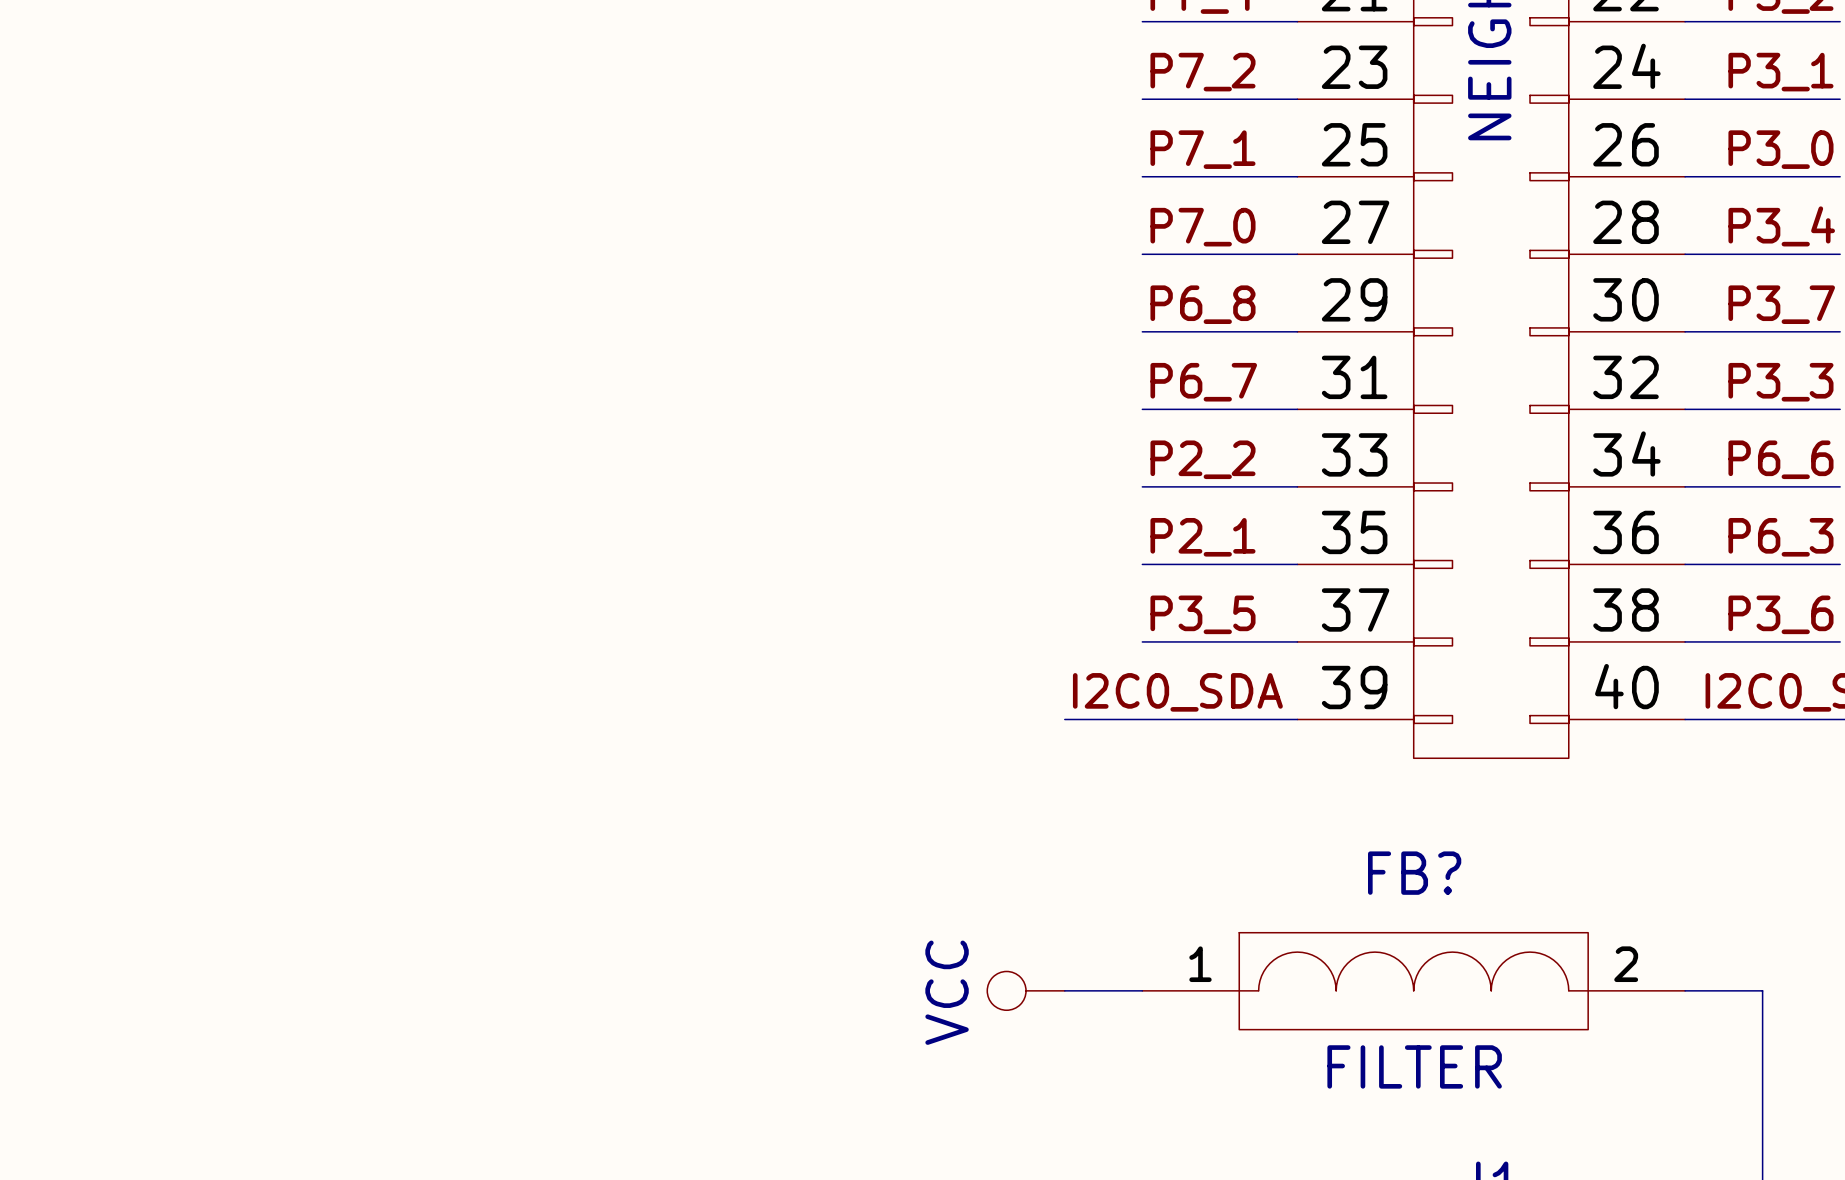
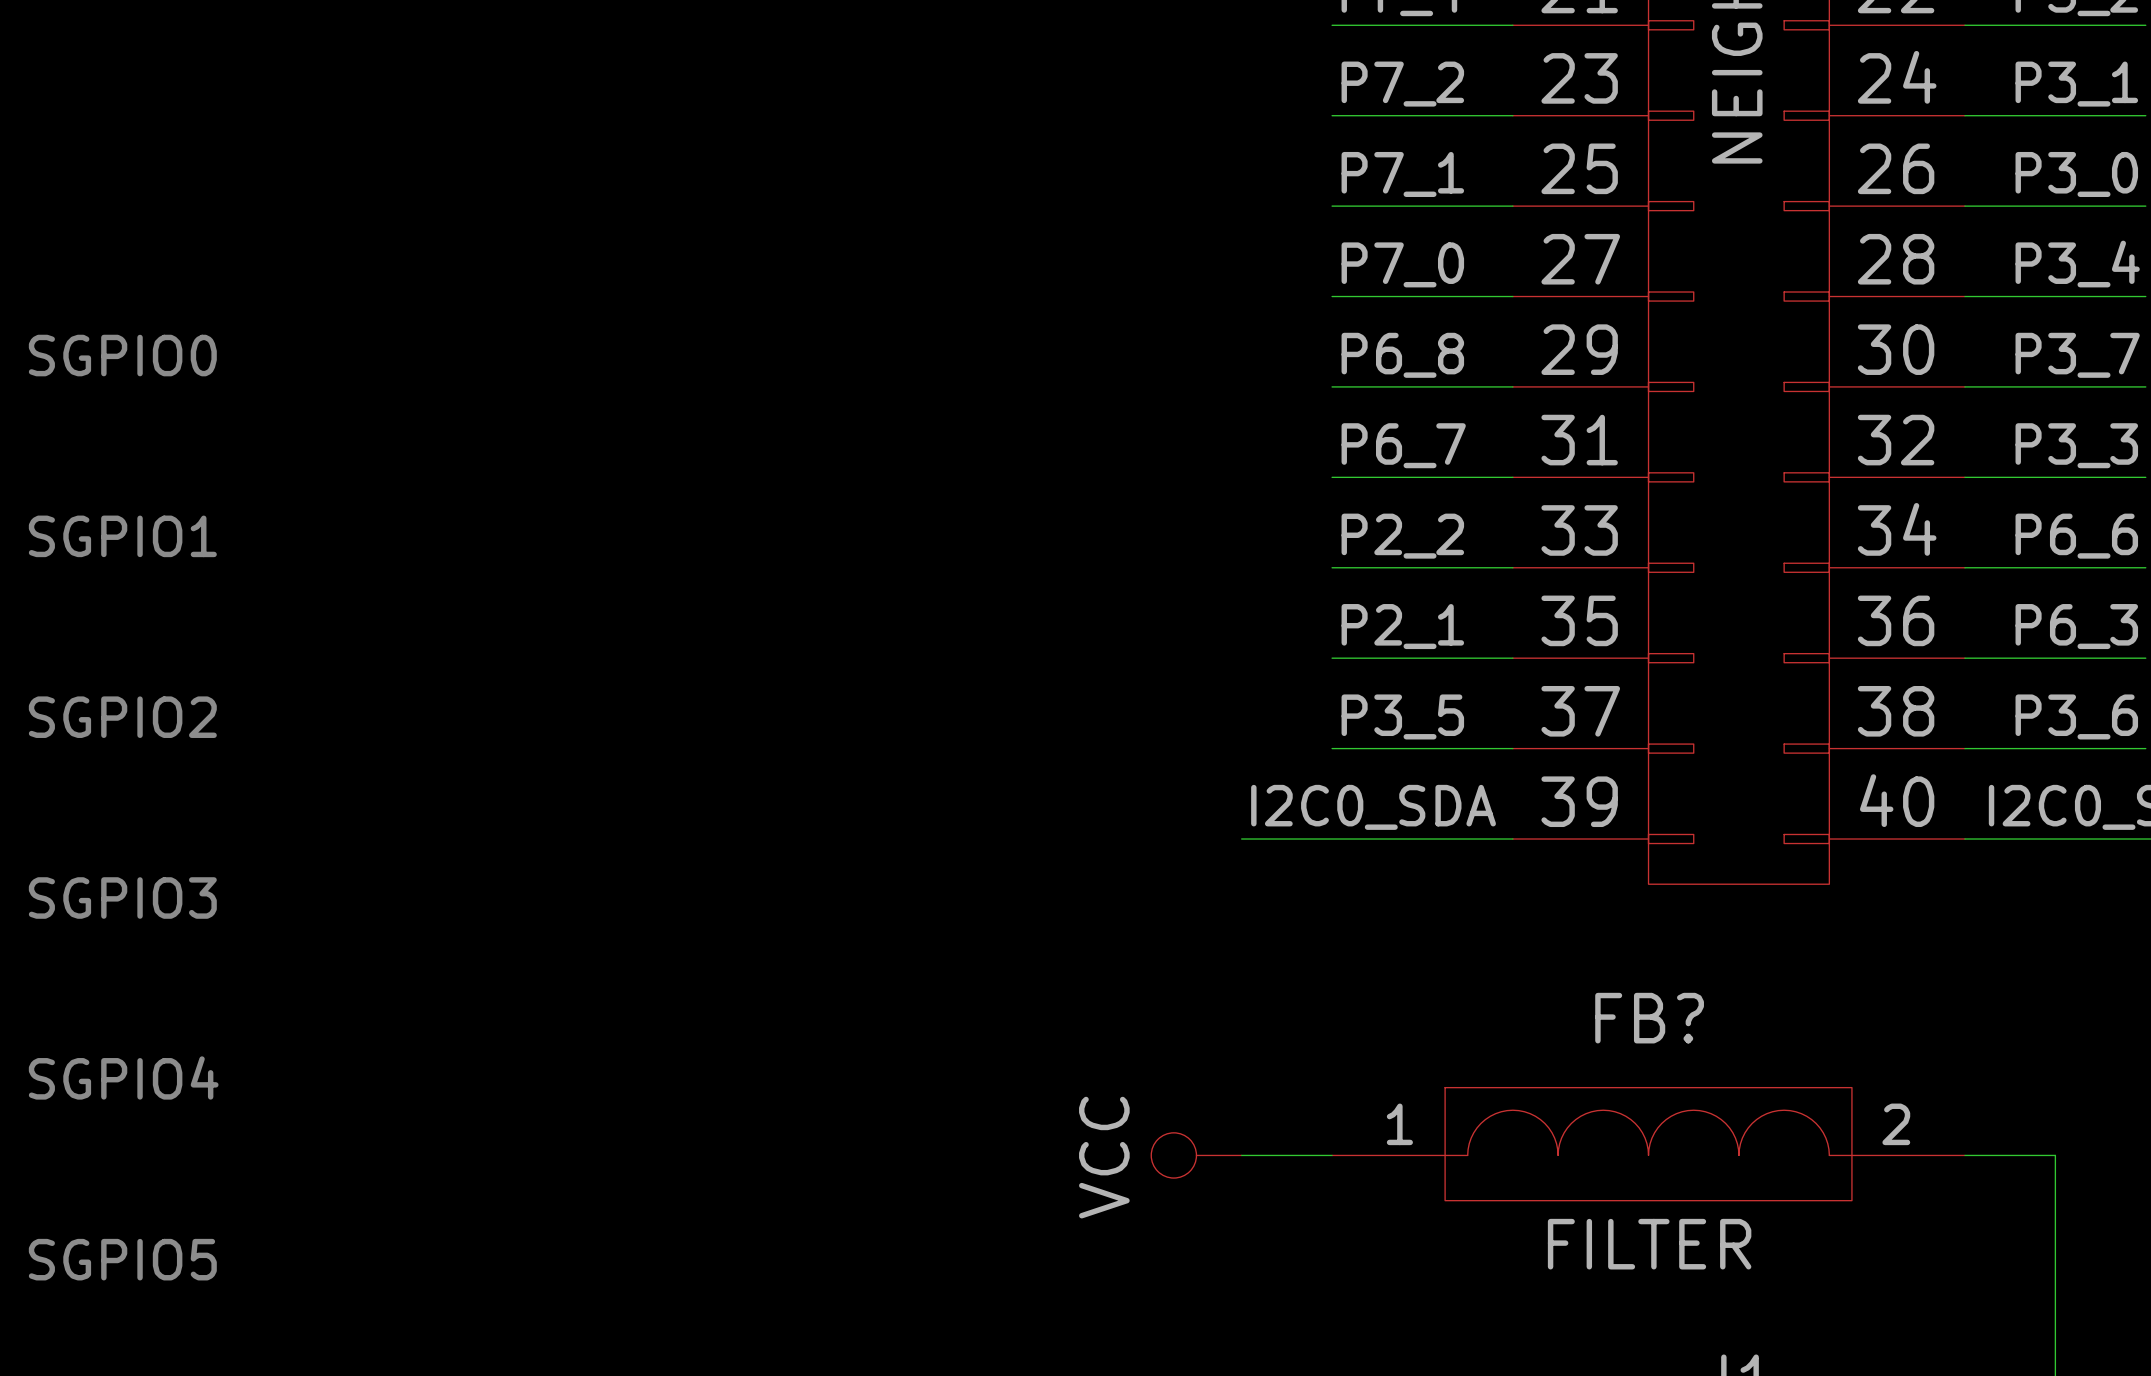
text: none -> SGPIO0 (122, 355)
text: none -> SGPIO1 (122, 536)
text: none -> SGPIO2 (122, 717)
text: none -> SGPIO3 (122, 898)
text: none -> SGPIO4 (123, 1077)
text: none -> SGPIO5 (122, 1259)

